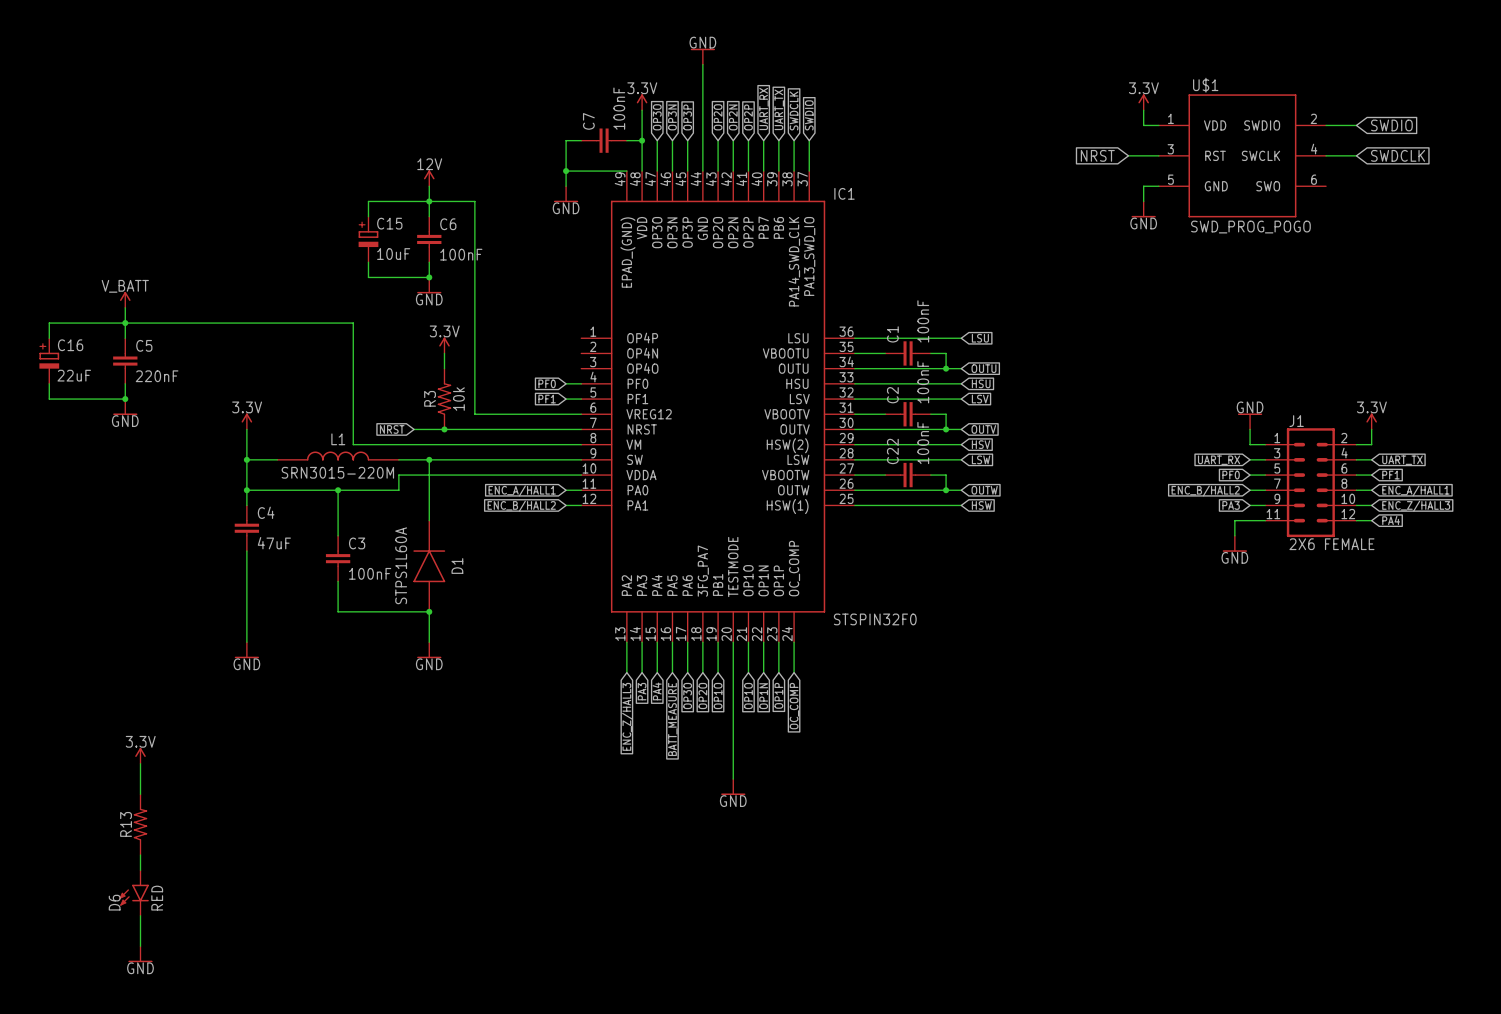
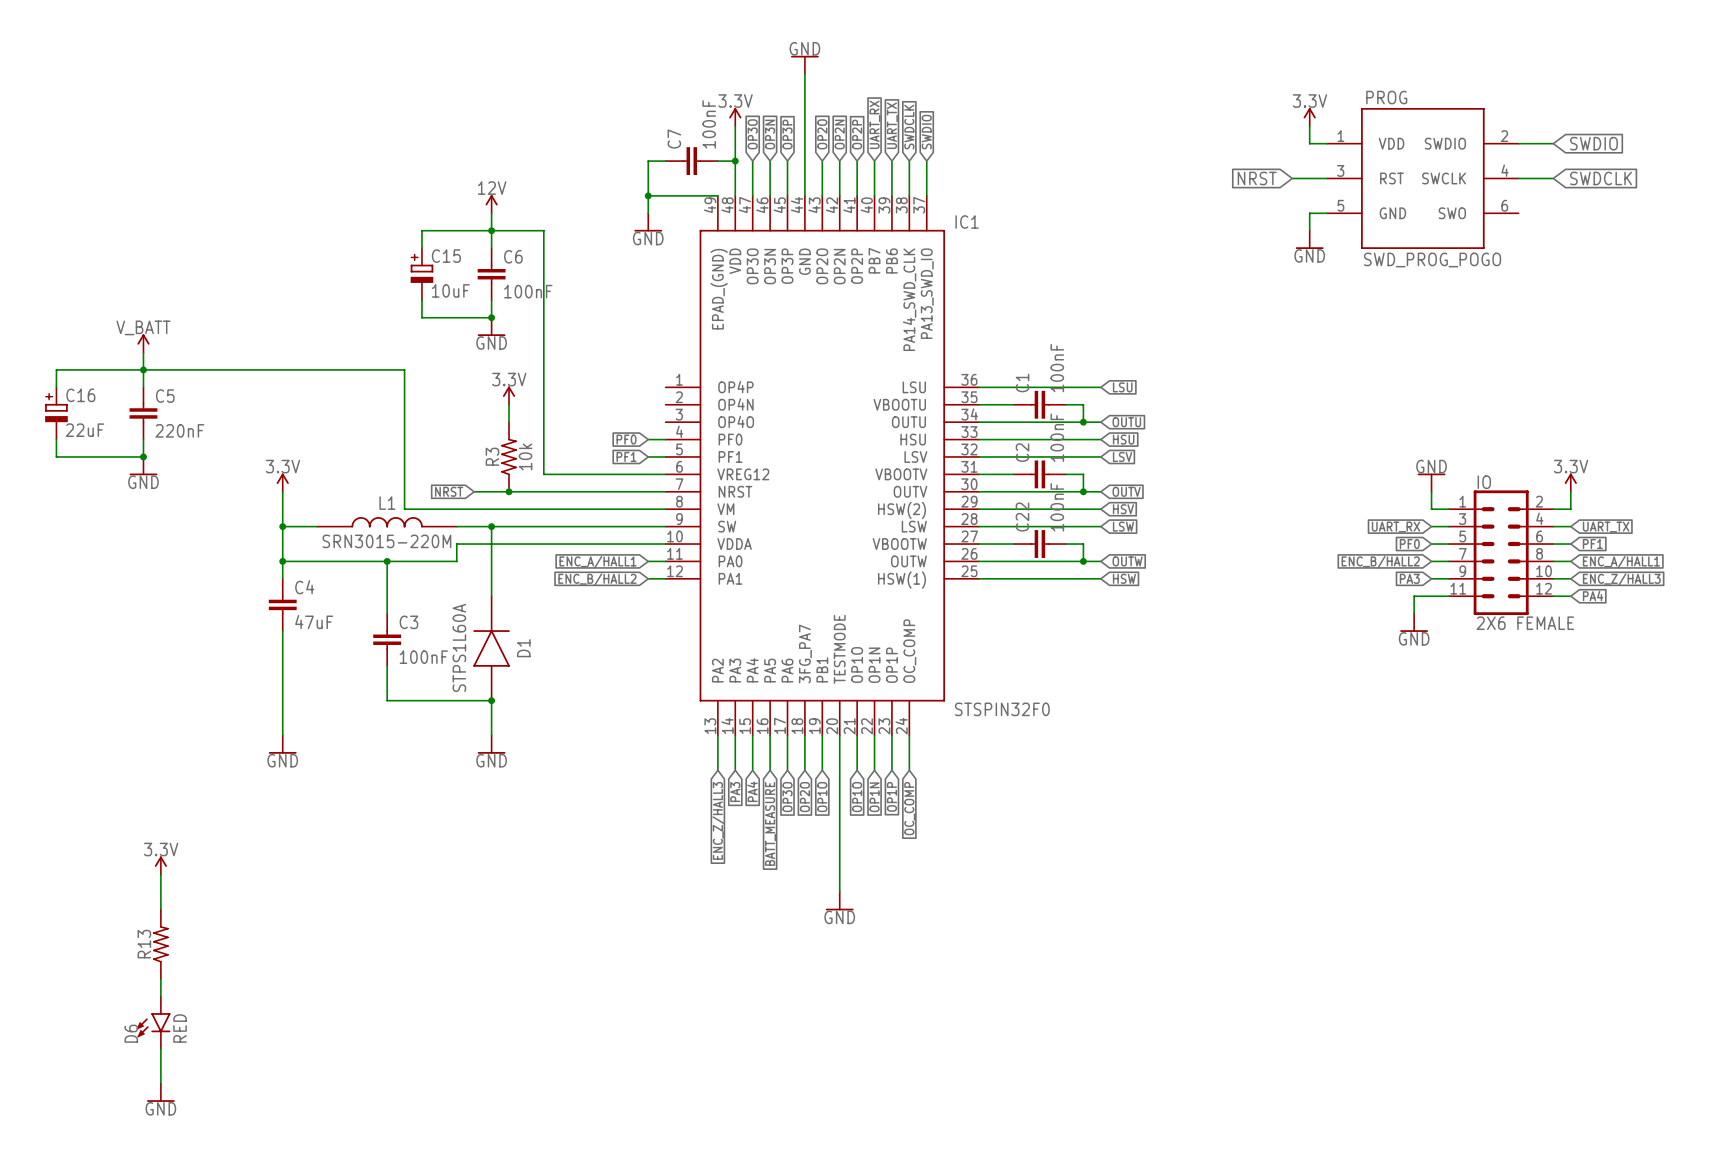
U$1 name: U$1 (1205, 85) -> PROG (1386, 97)
J1 name: J1 (1296, 421) -> IO (1484, 482)

